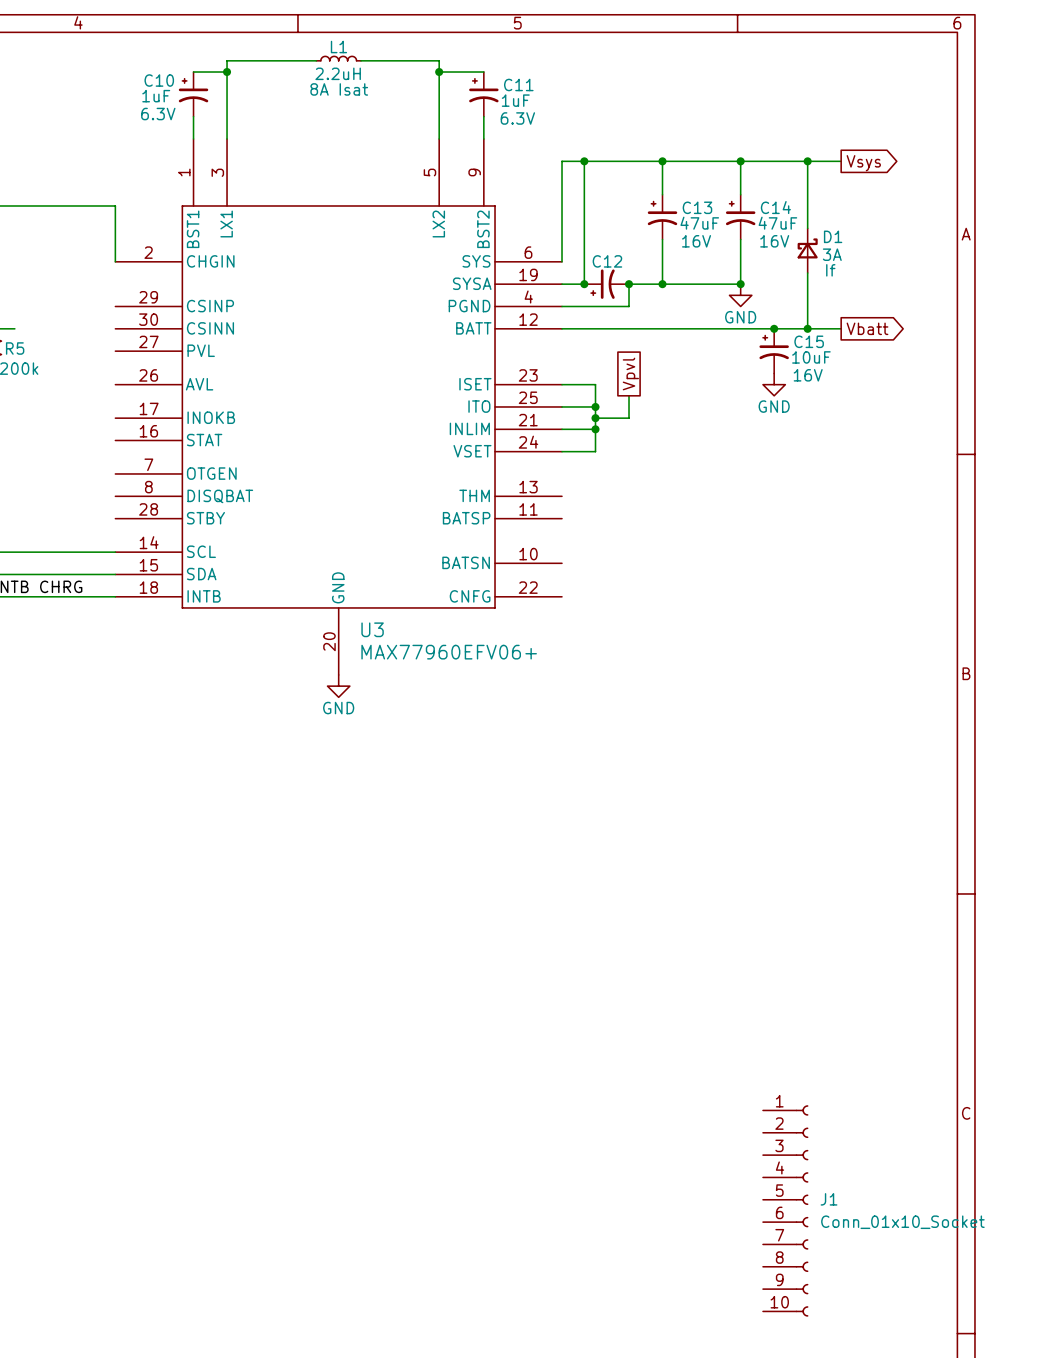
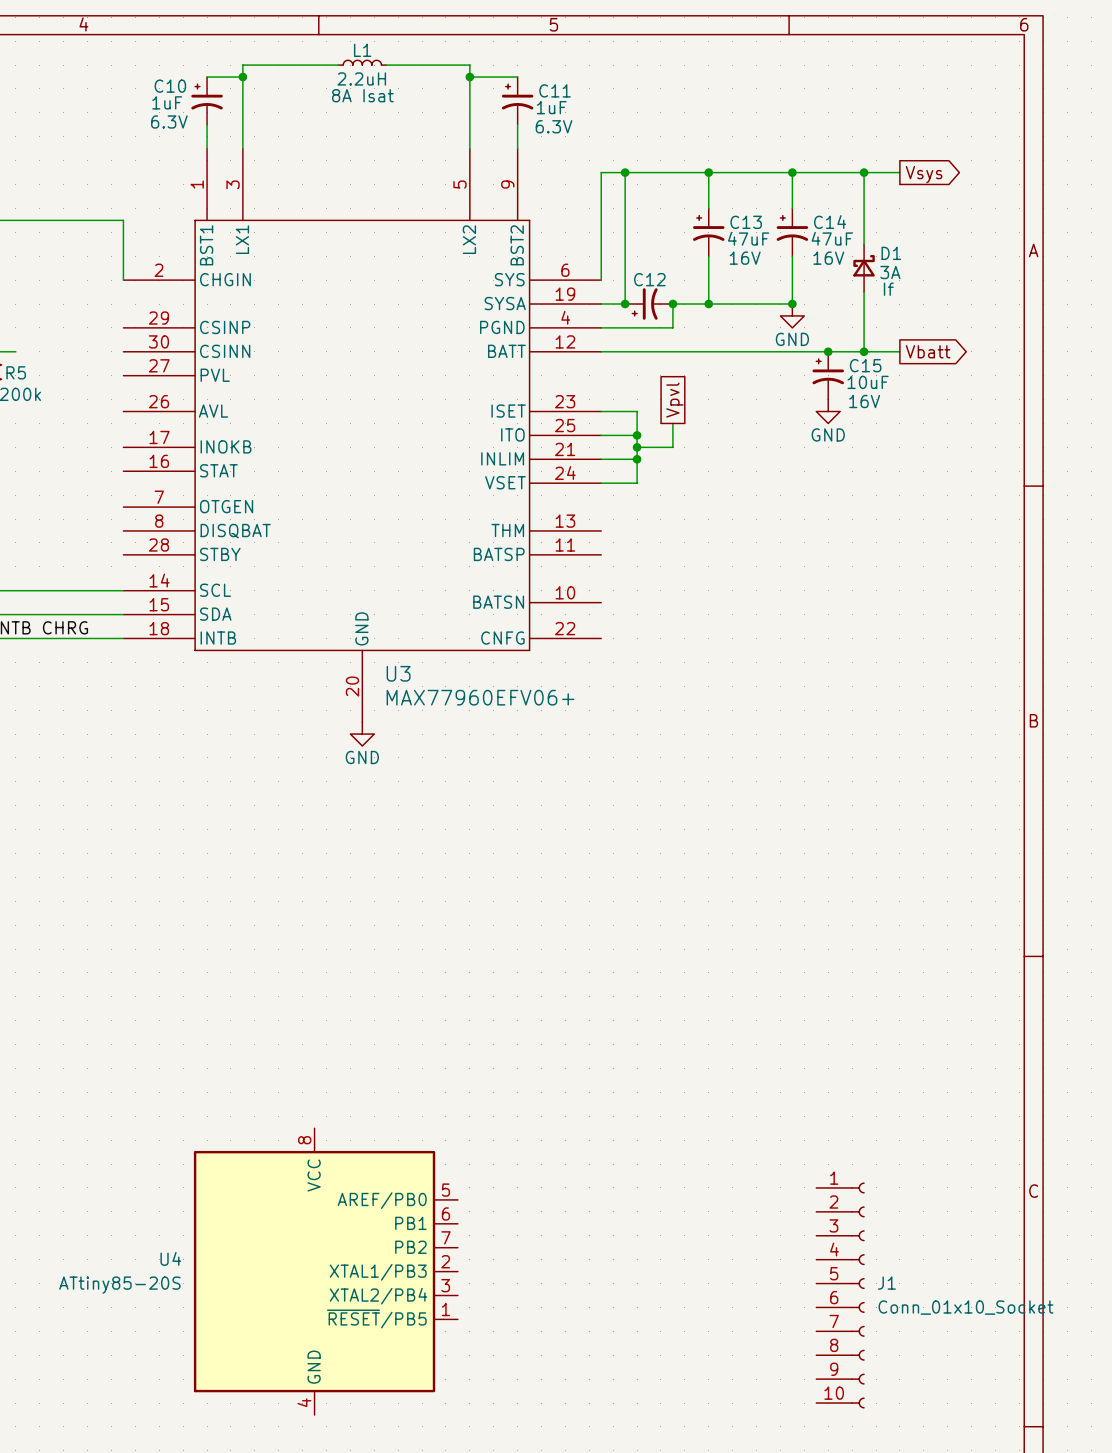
U4: none -> ATtiny85-20S (325, 1271)

